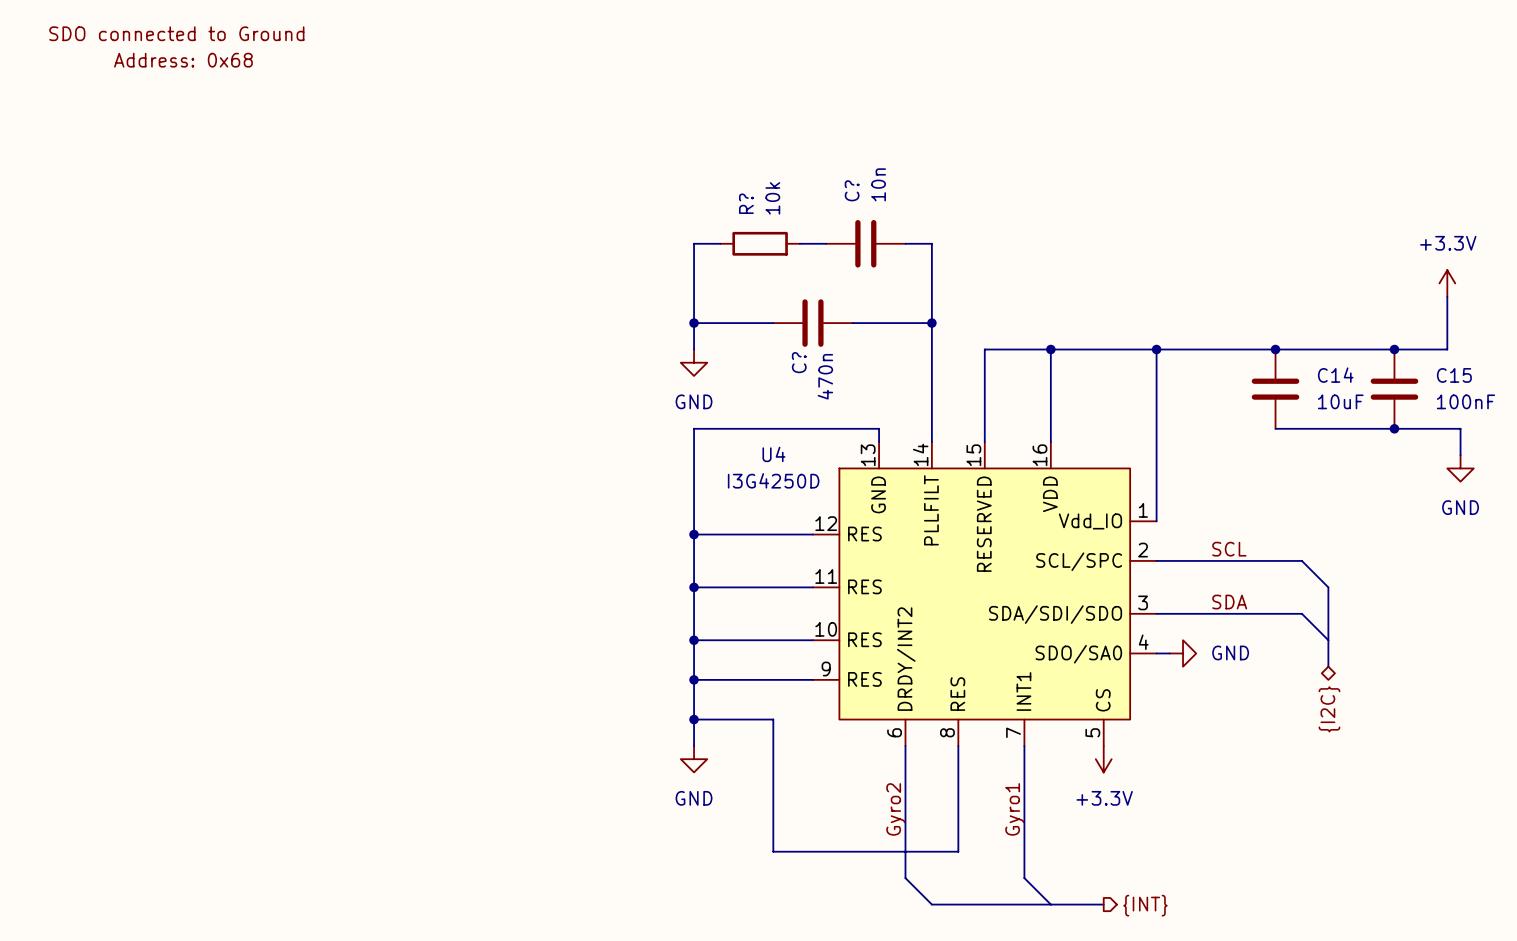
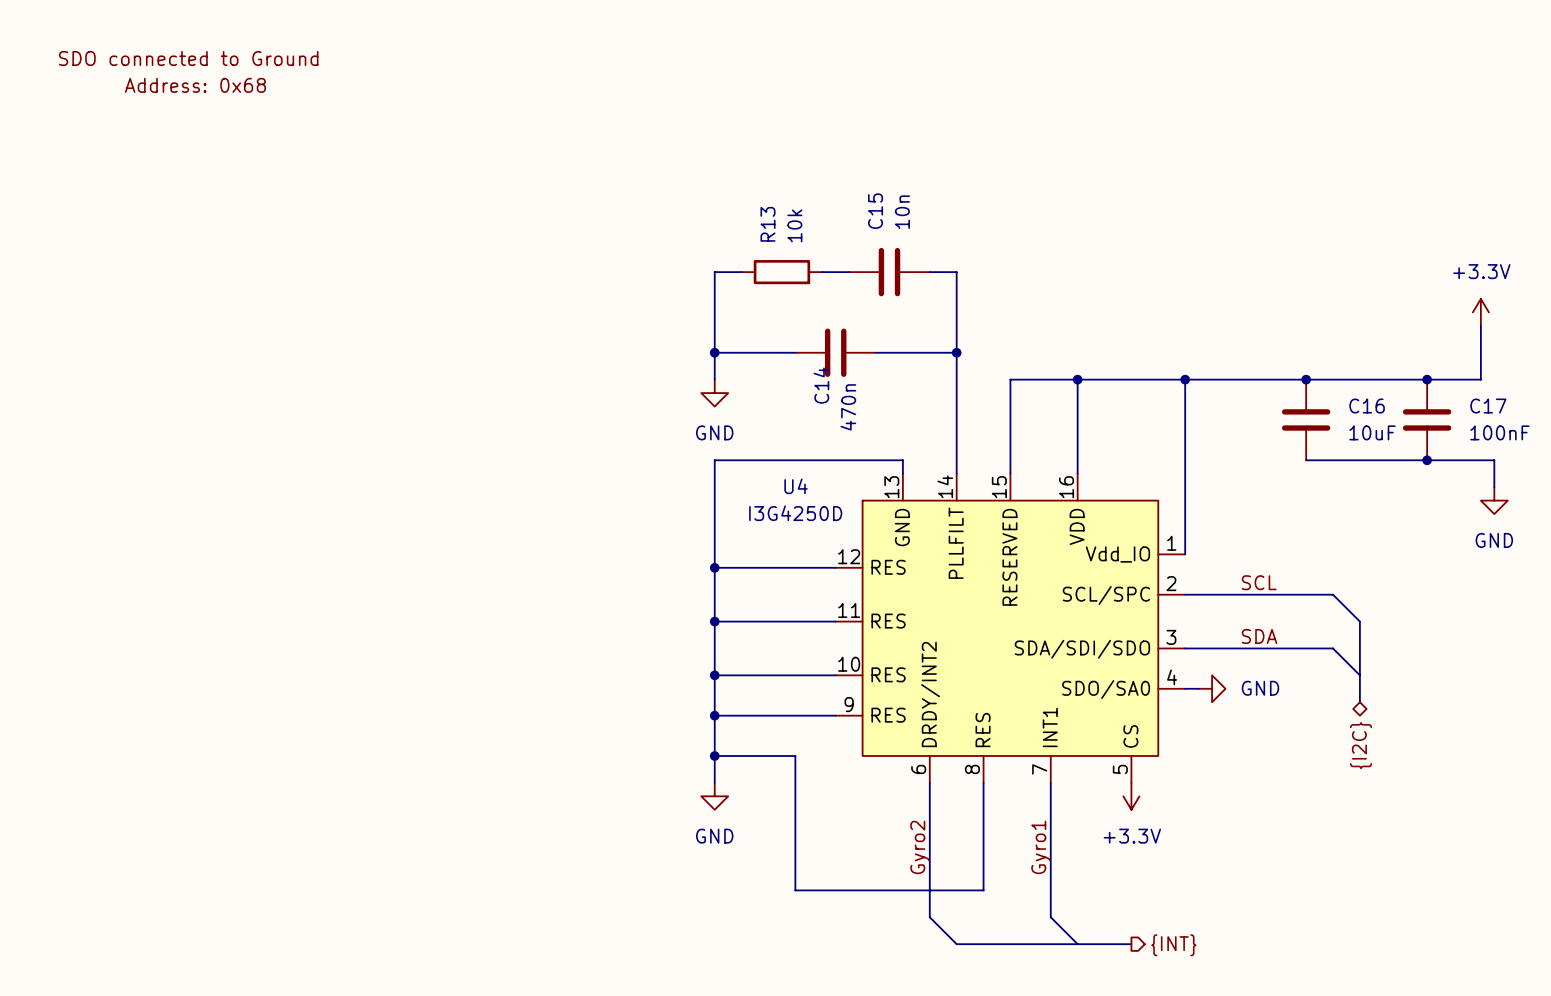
C? name: C? (852, 190) -> C15 (875, 211)
R? name: R? (746, 203) -> R13 (767, 224)
C? name: C? (799, 362) -> C14 (821, 385)
C14 name: C14 (1335, 375) -> C16 (1367, 406)
C15 name: C15 (1454, 375) -> C17 (1488, 406)

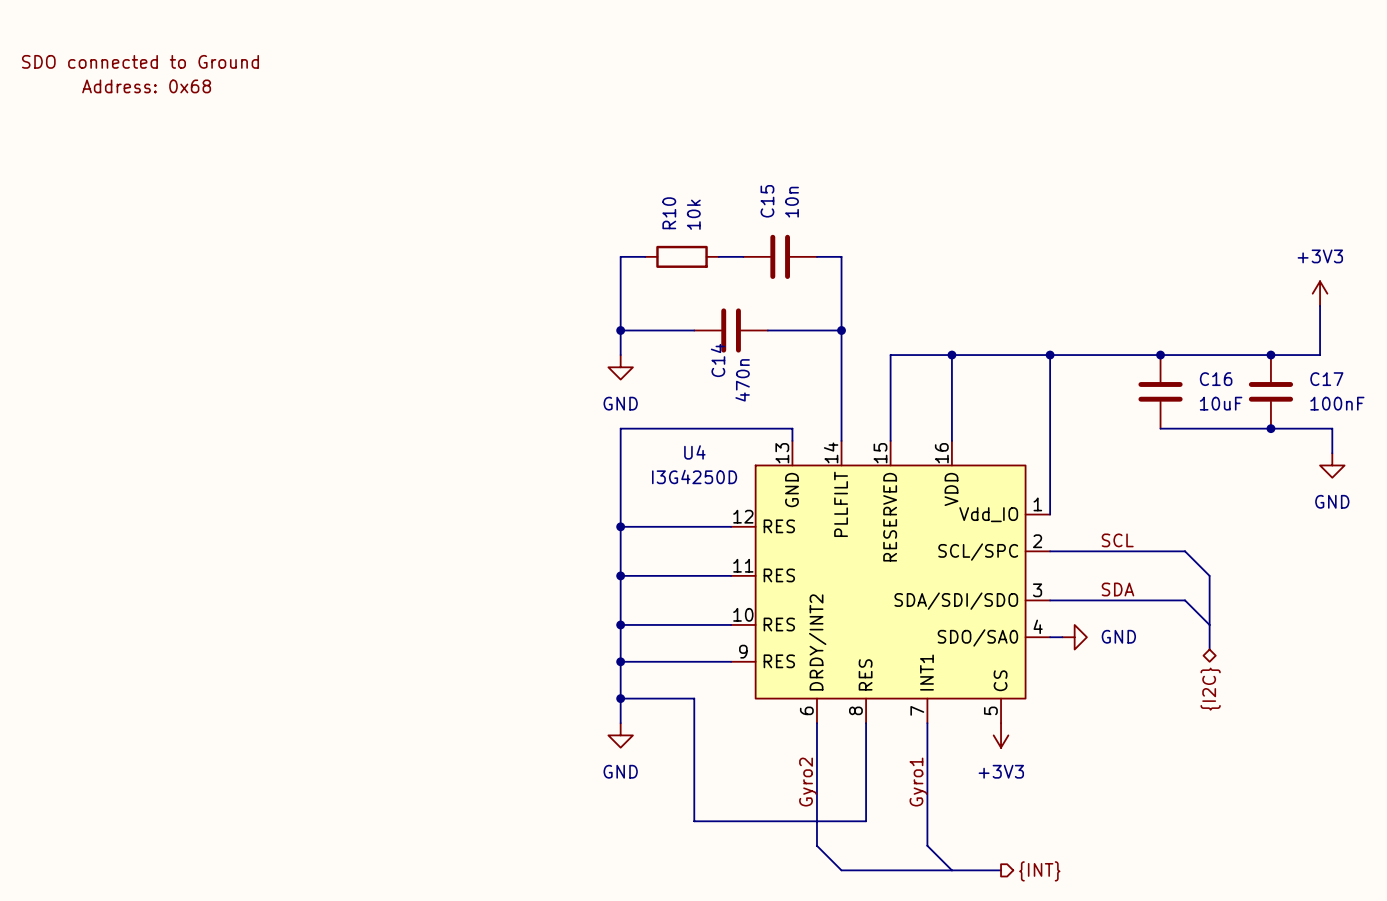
R13 name: R13 (767, 224) -> R10 (669, 213)
power symbol: +3.3V (1480, 312) -> +3V3 (1320, 293)
power symbol: +3.3V (1131, 796) -> +3V3 (1001, 735)

